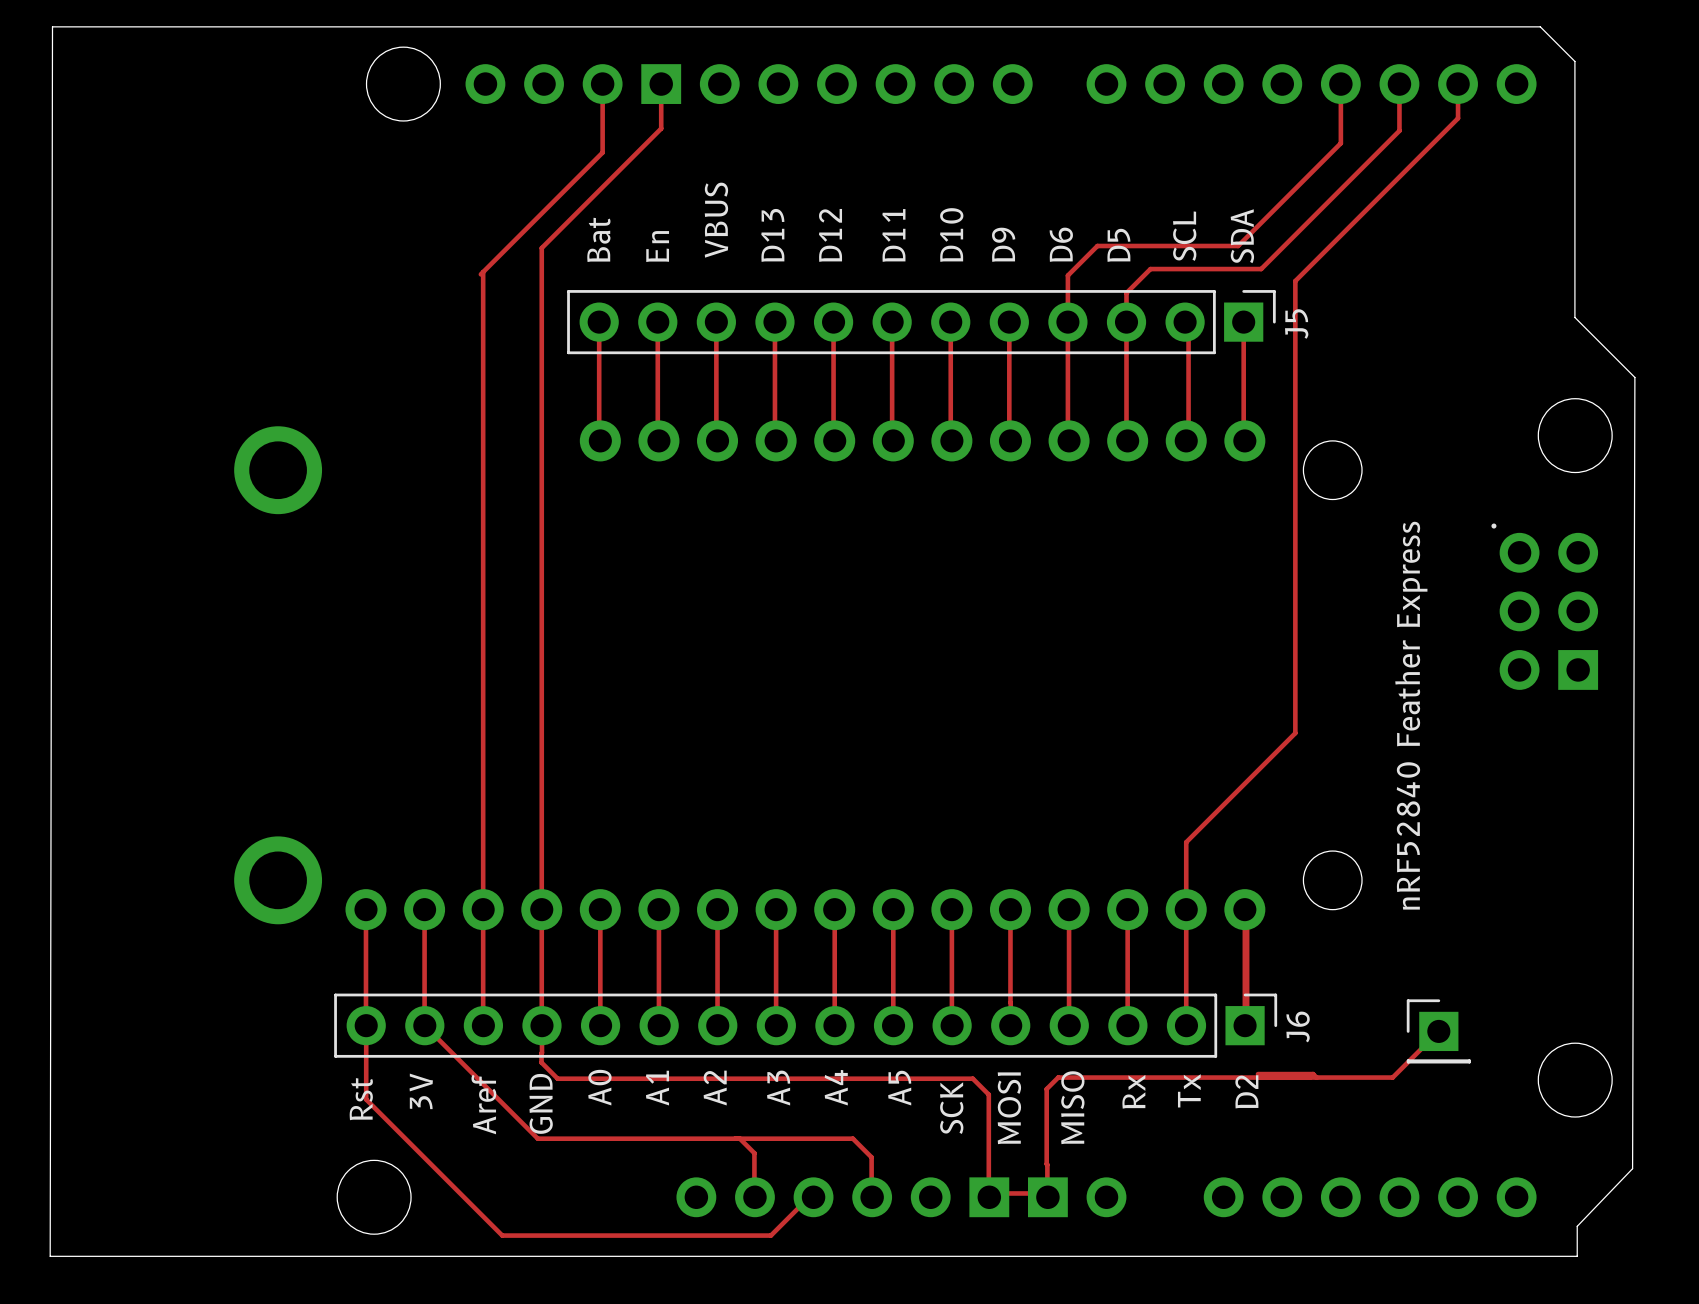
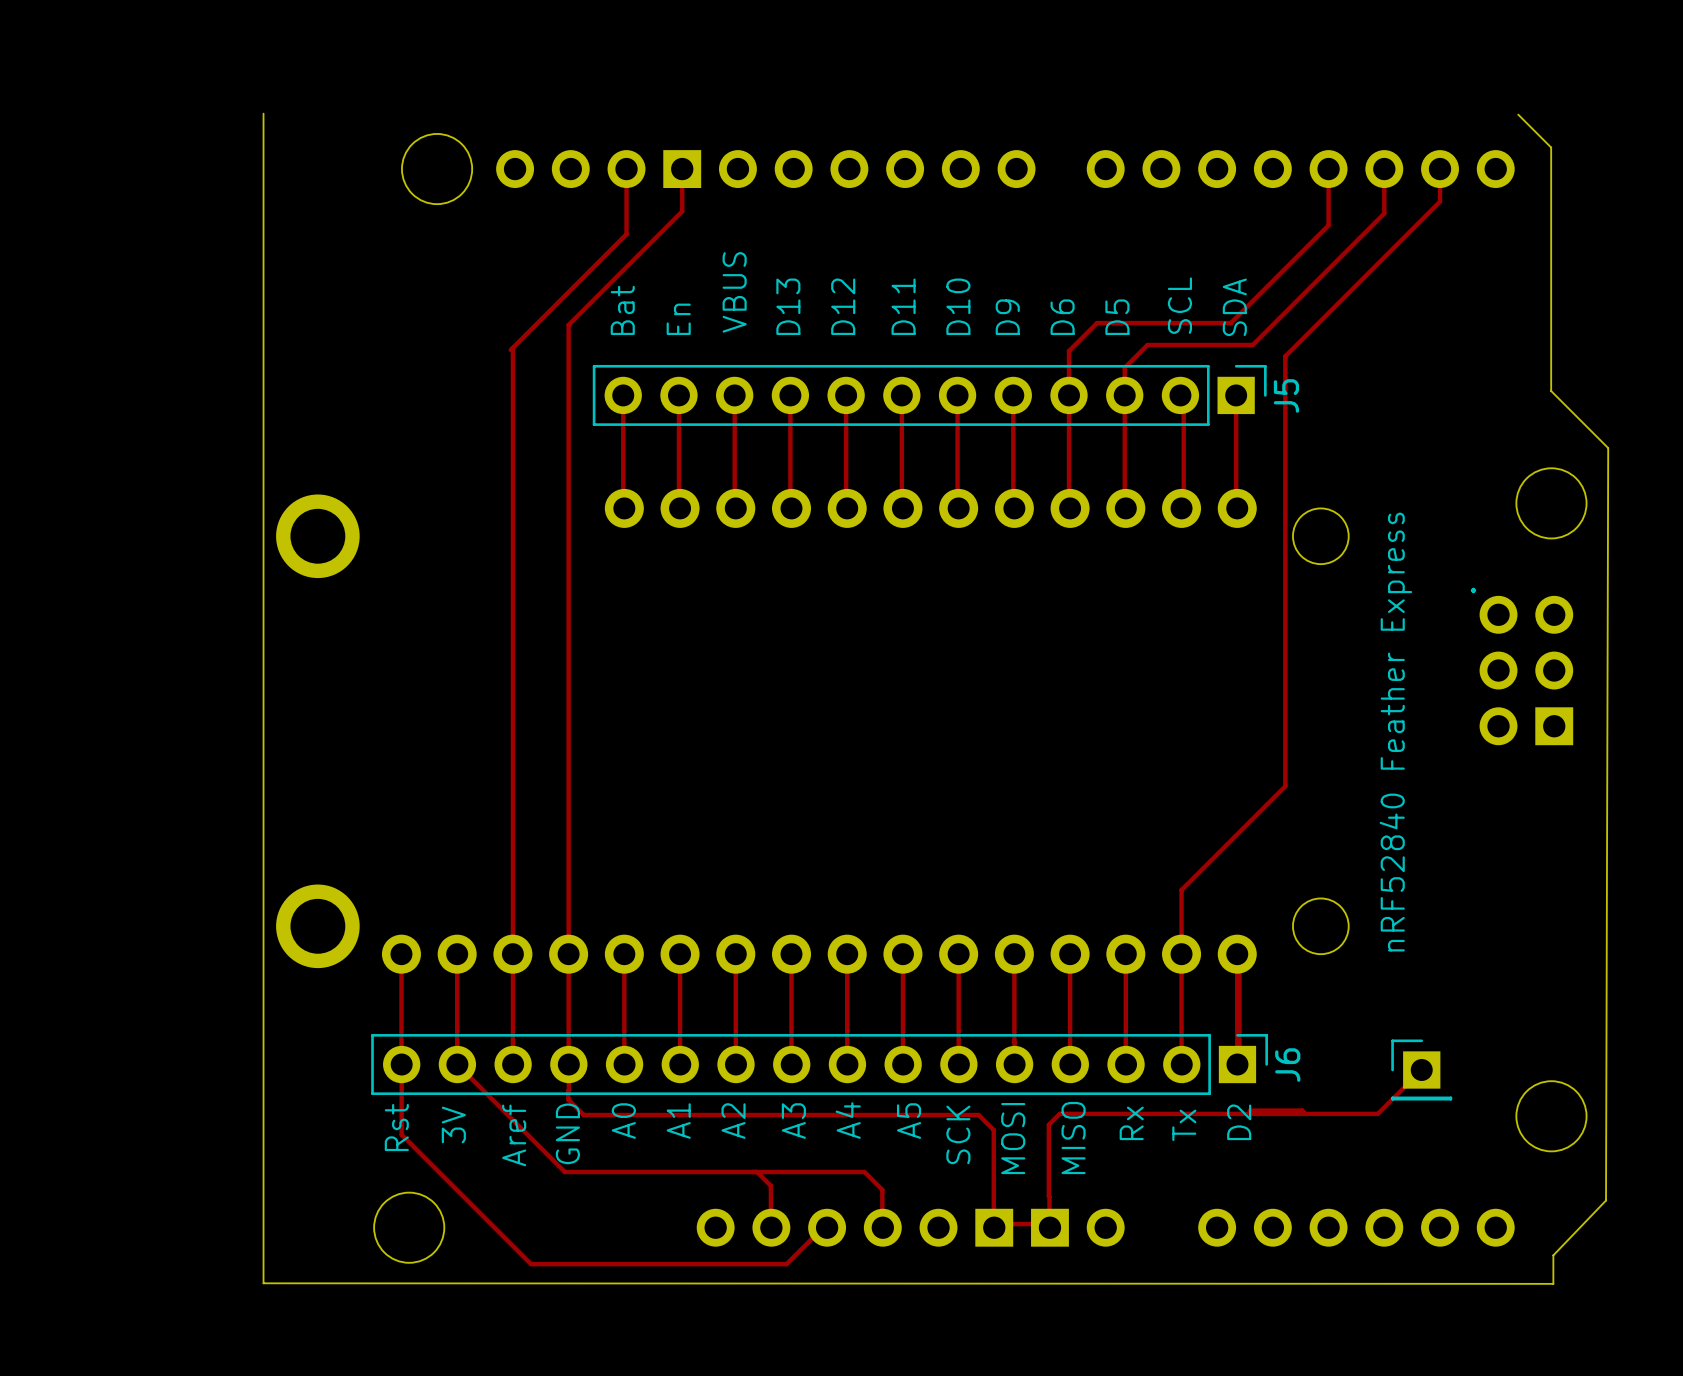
board edge: (1540, 26) (52, 26) (50, 1256) (1577, 1256) -> (263, 113) (263, 1283) (1553, 1283)

